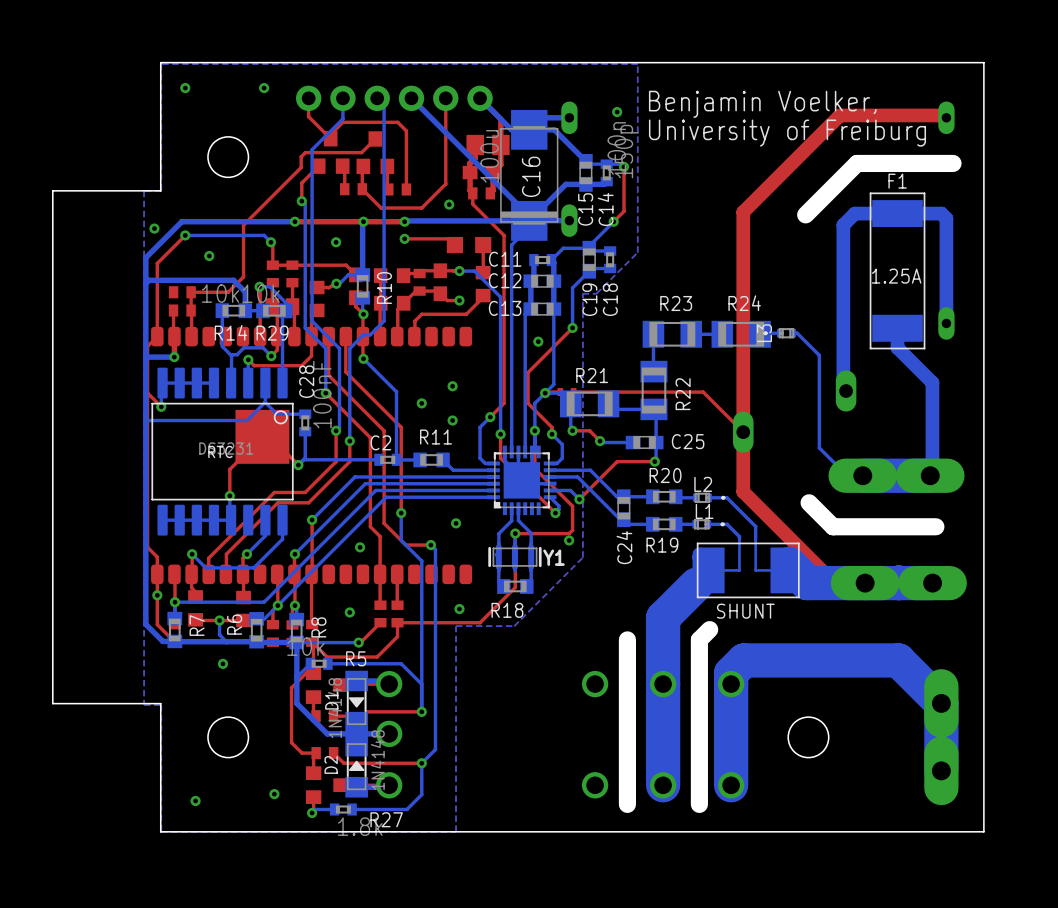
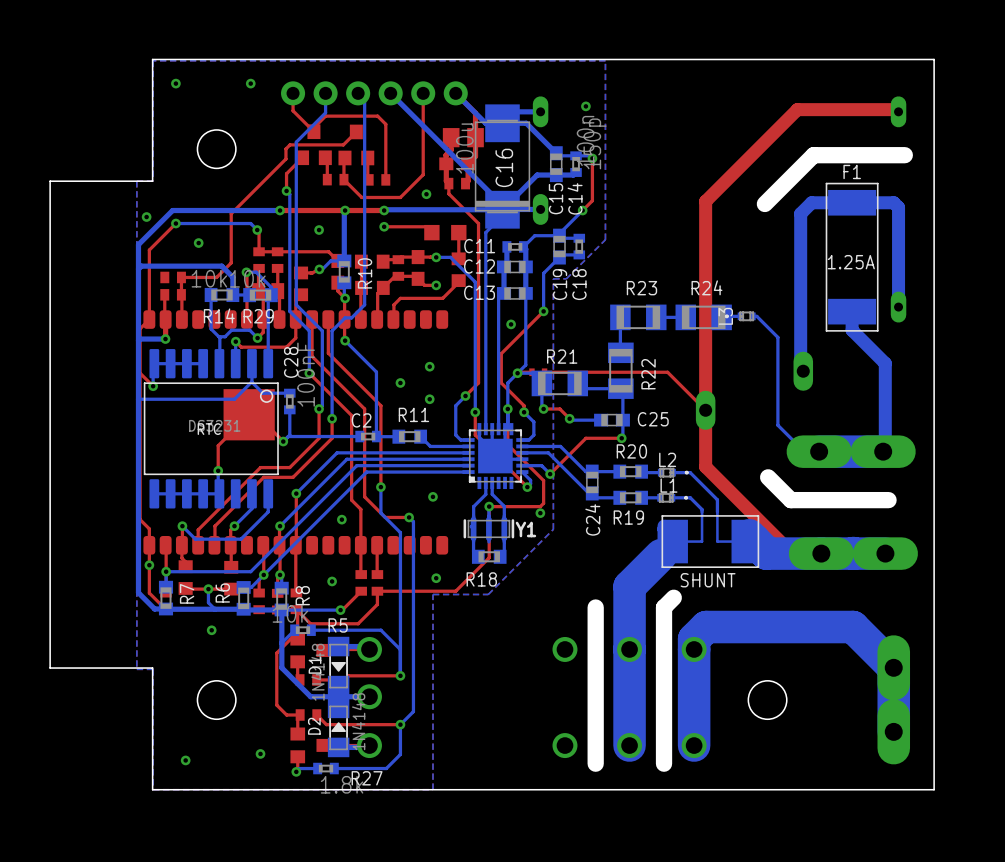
text: Benjamin Voelker, (762, 104) -> none
text: University of Freiburg (787, 133) -> none

